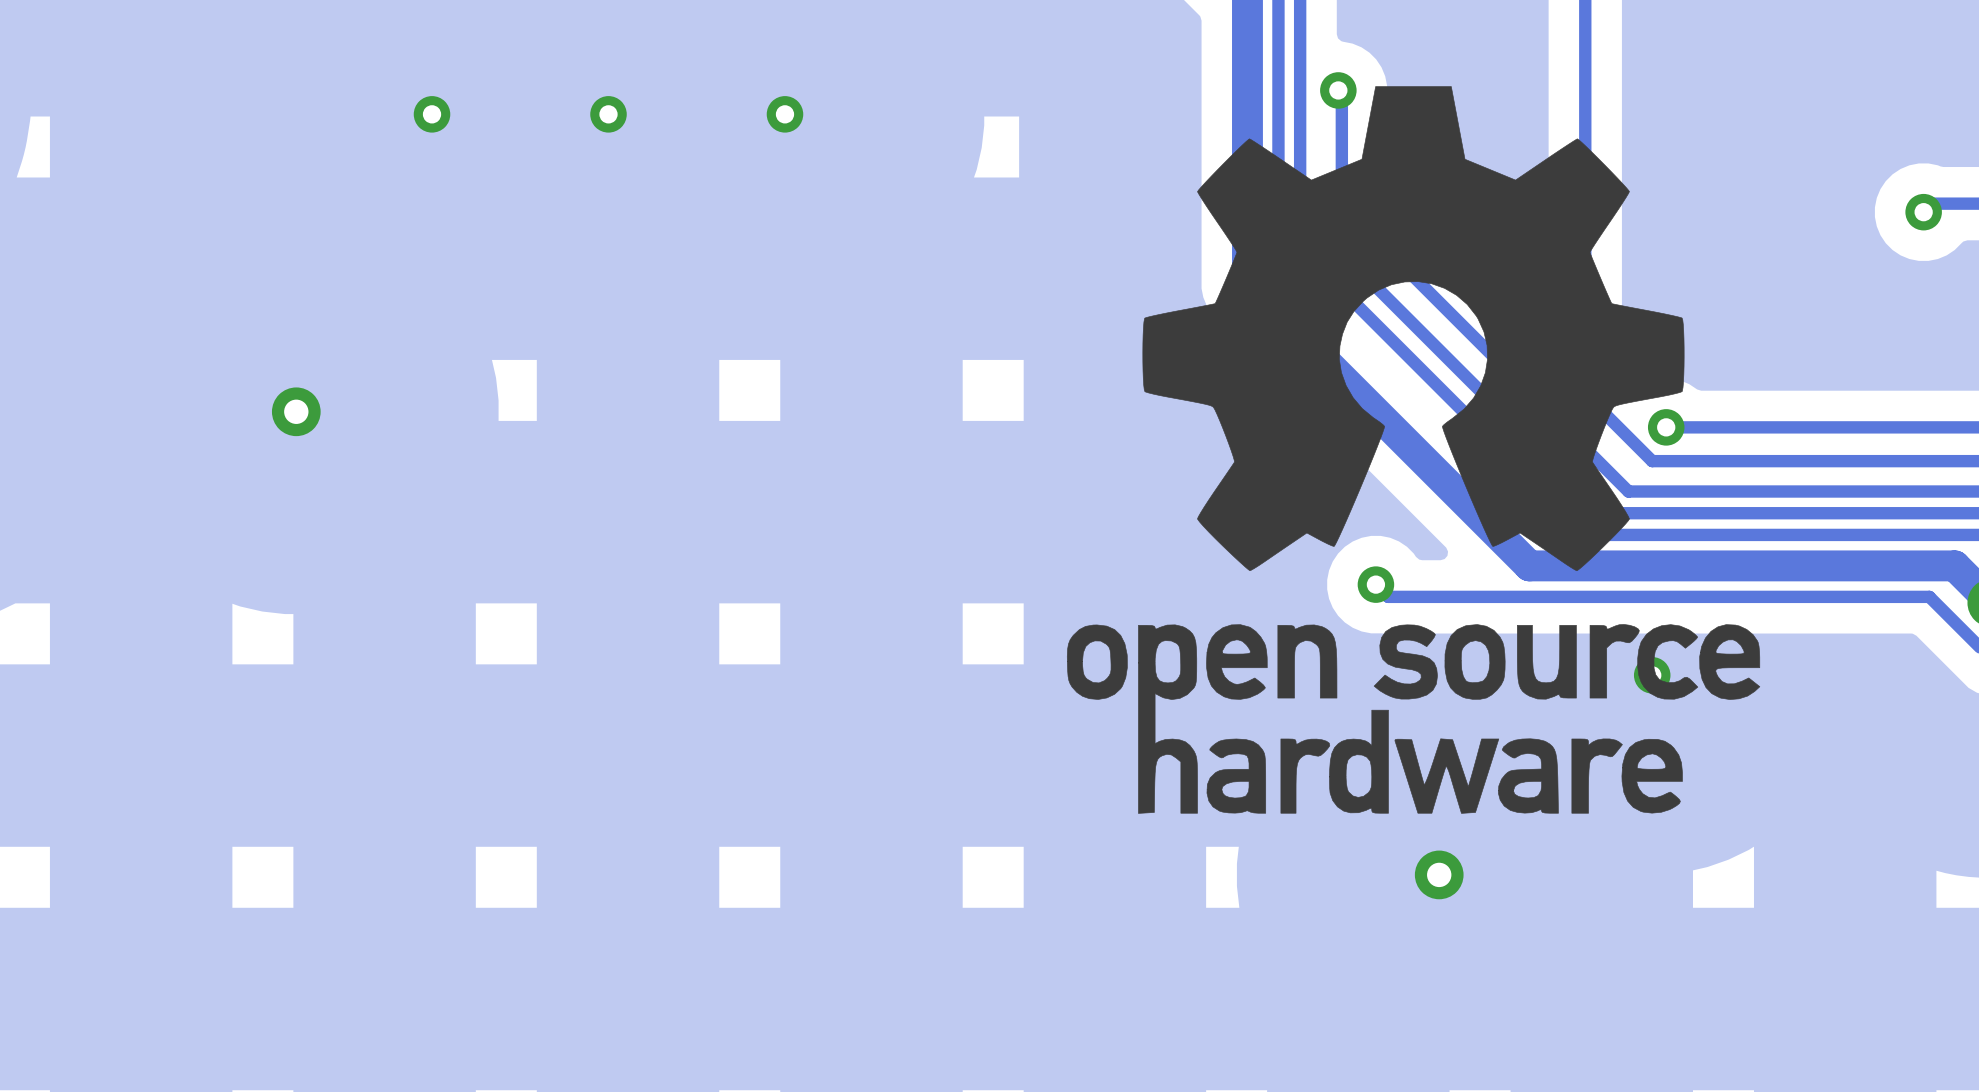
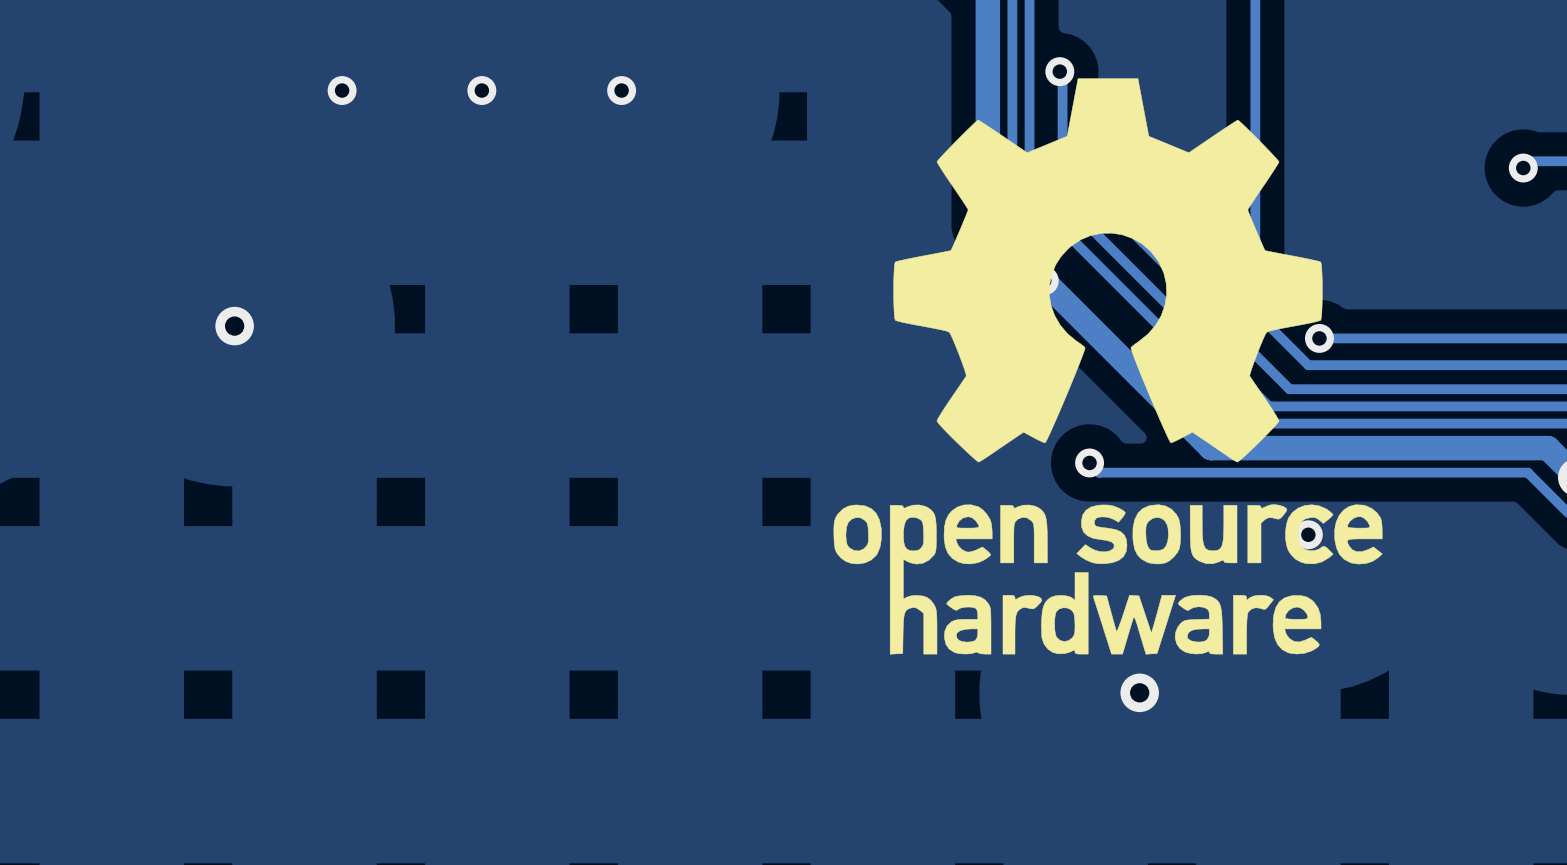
drawing position: (1413, 449) -> (1108, 366)

